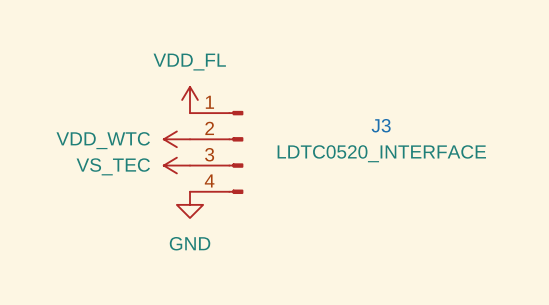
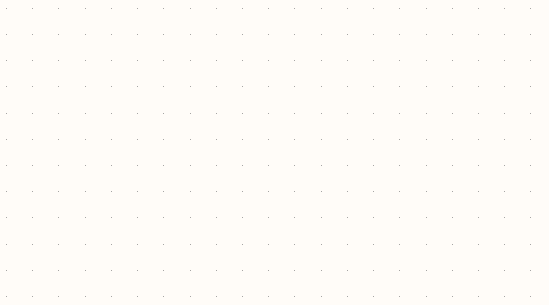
power symbol: VDD_FL (190, 99) -> none
power symbol: VDD_WTC (176, 139) -> none
J3: LDTC0520_INTERFACE (216, 152) -> none
power symbol: VS_TEC (176, 165) -> none
power symbol: GND (190, 204) -> none

